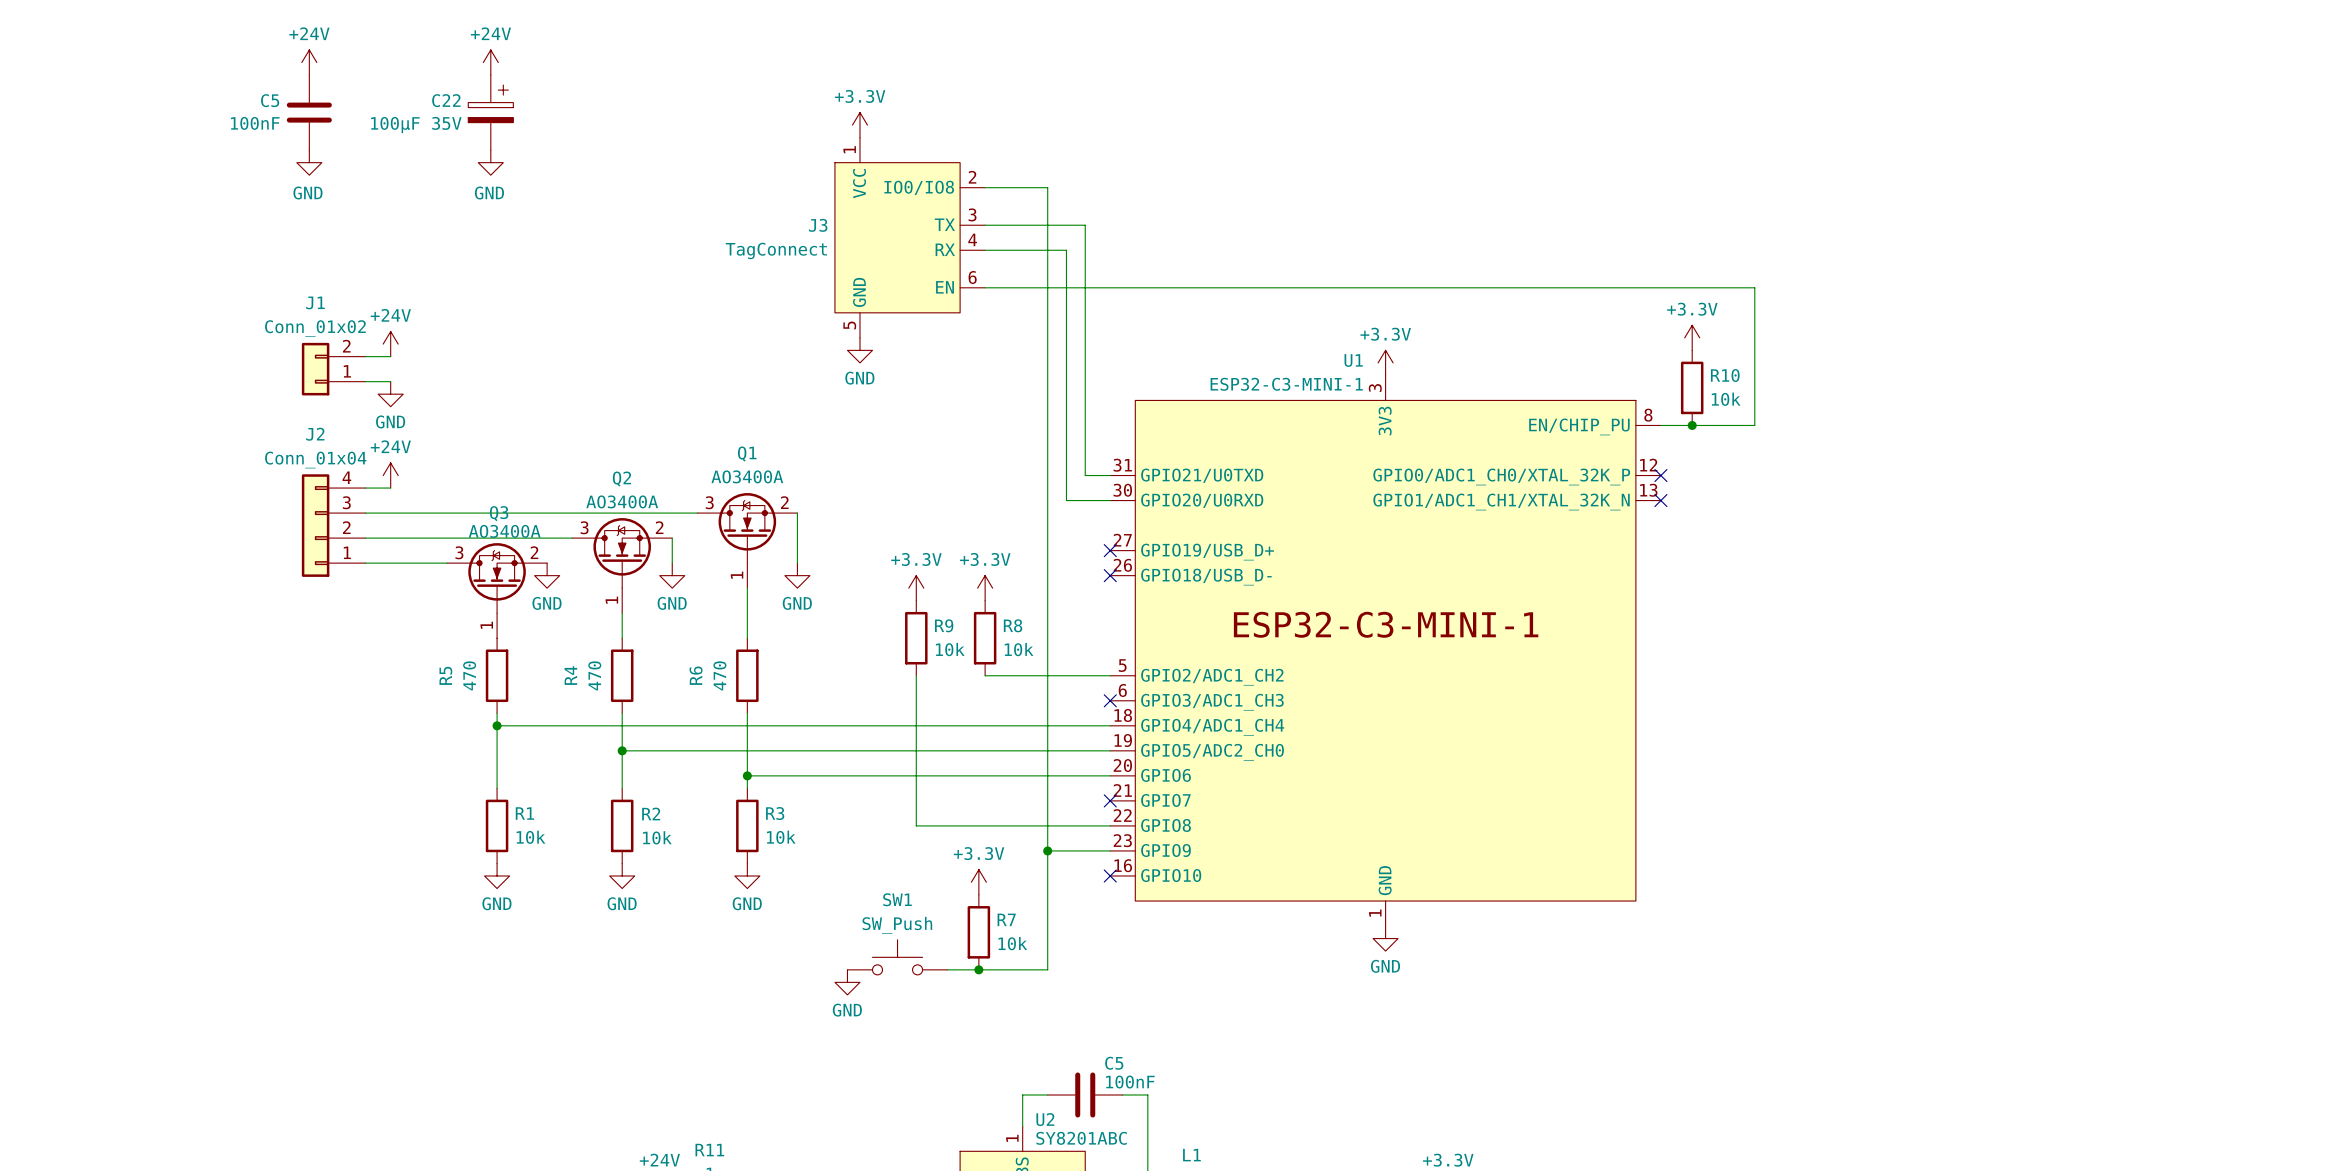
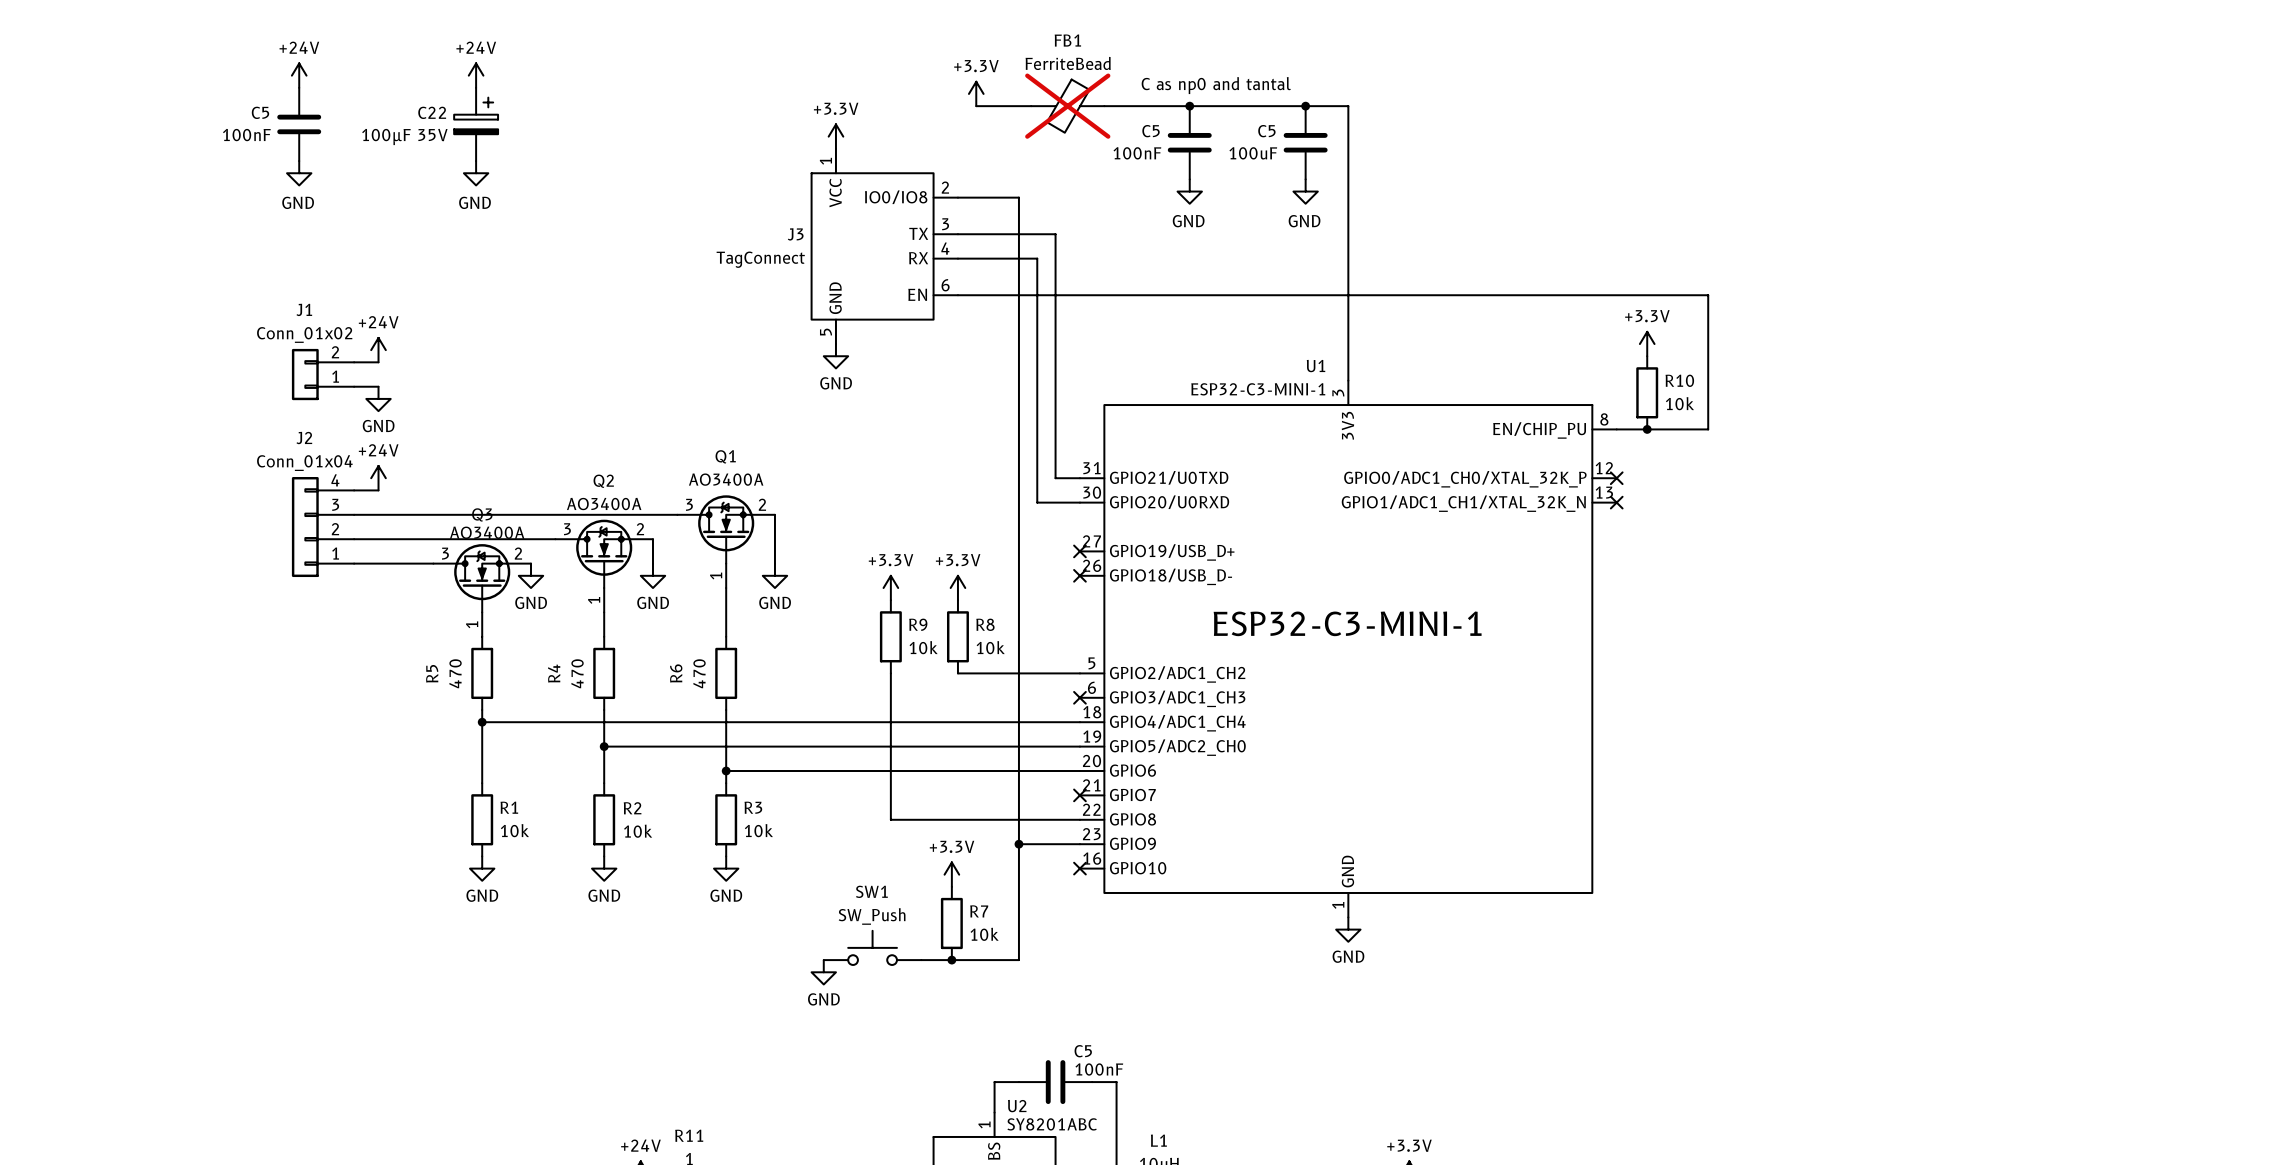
text: none -> C as np0 and tantal (1216, 85)
power symbol: none -> +3.3V (976, 93)
wire: none -> (976, 106) (1031, 106)
FB1: none -> FerriteBead (1067, 106)
wire: none -> (1104, 106) (1348, 106) (1348, 380)
junction: none -> (1189, 106)
junction: none -> (1305, 106)
C5: none -> 100nF (1189, 142)
C5: none -> 100uF (1305, 142)
power symbol: none -> GND (1189, 191)
power symbol: none -> GND (1305, 191)
power symbol: +3.3V (1385, 362) -> none

